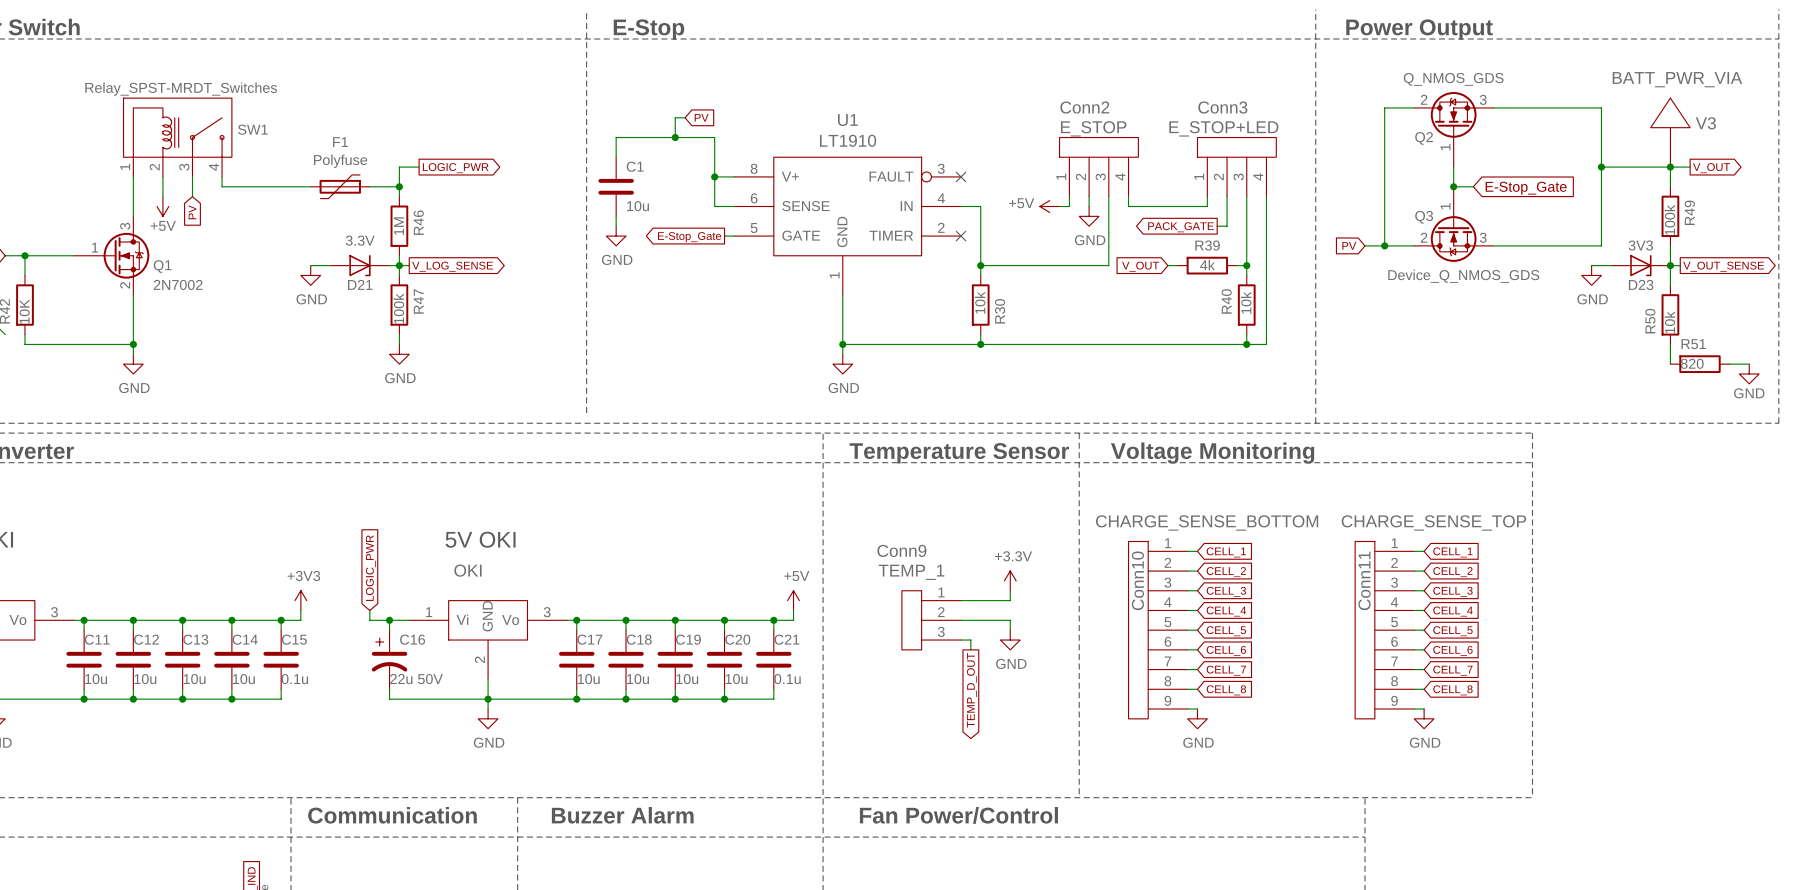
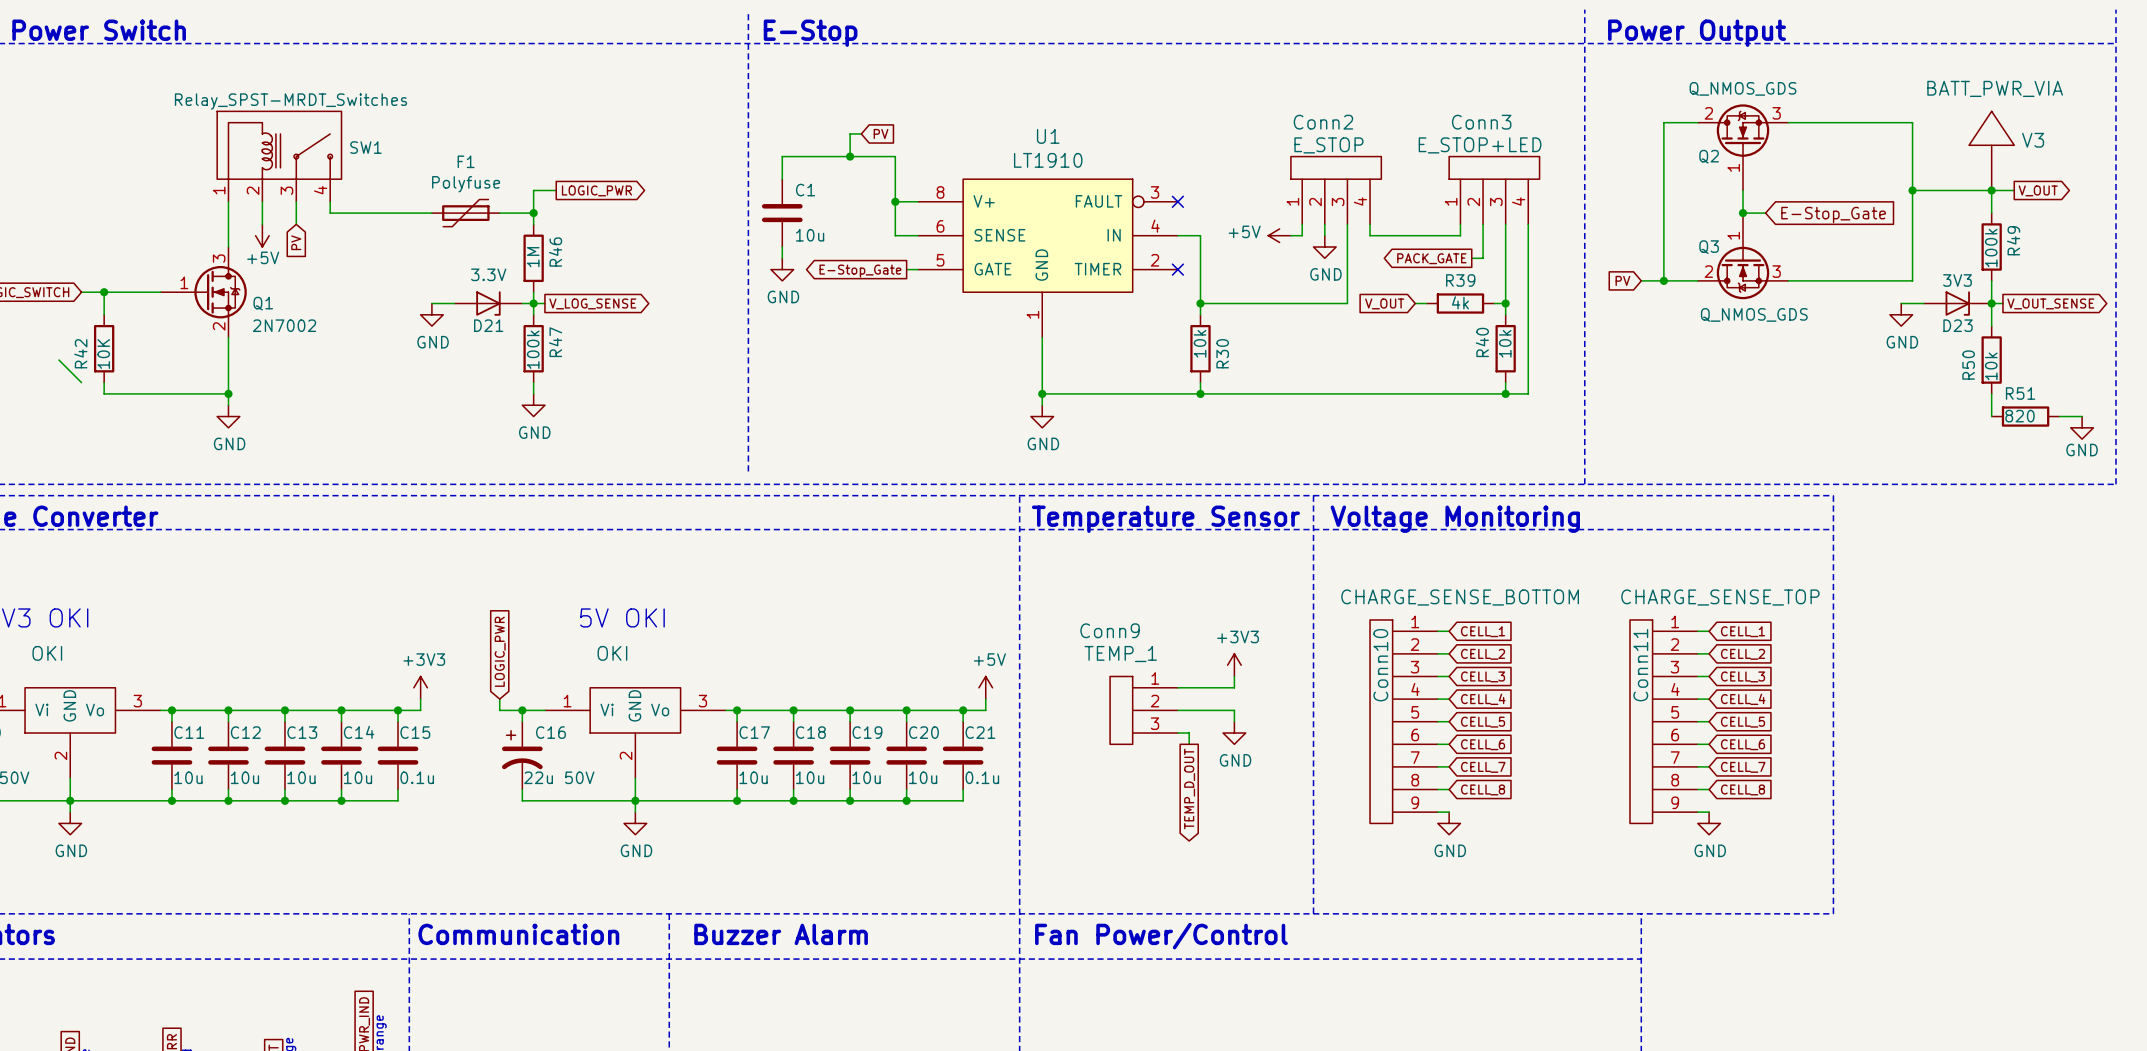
Q3 value: Device_Q_NMOS_GDS (1463, 276) -> Q_NMOS_GDS (1754, 314)
power symbol: +3.3V (1010, 580) -> +3V3 (1234, 665)

